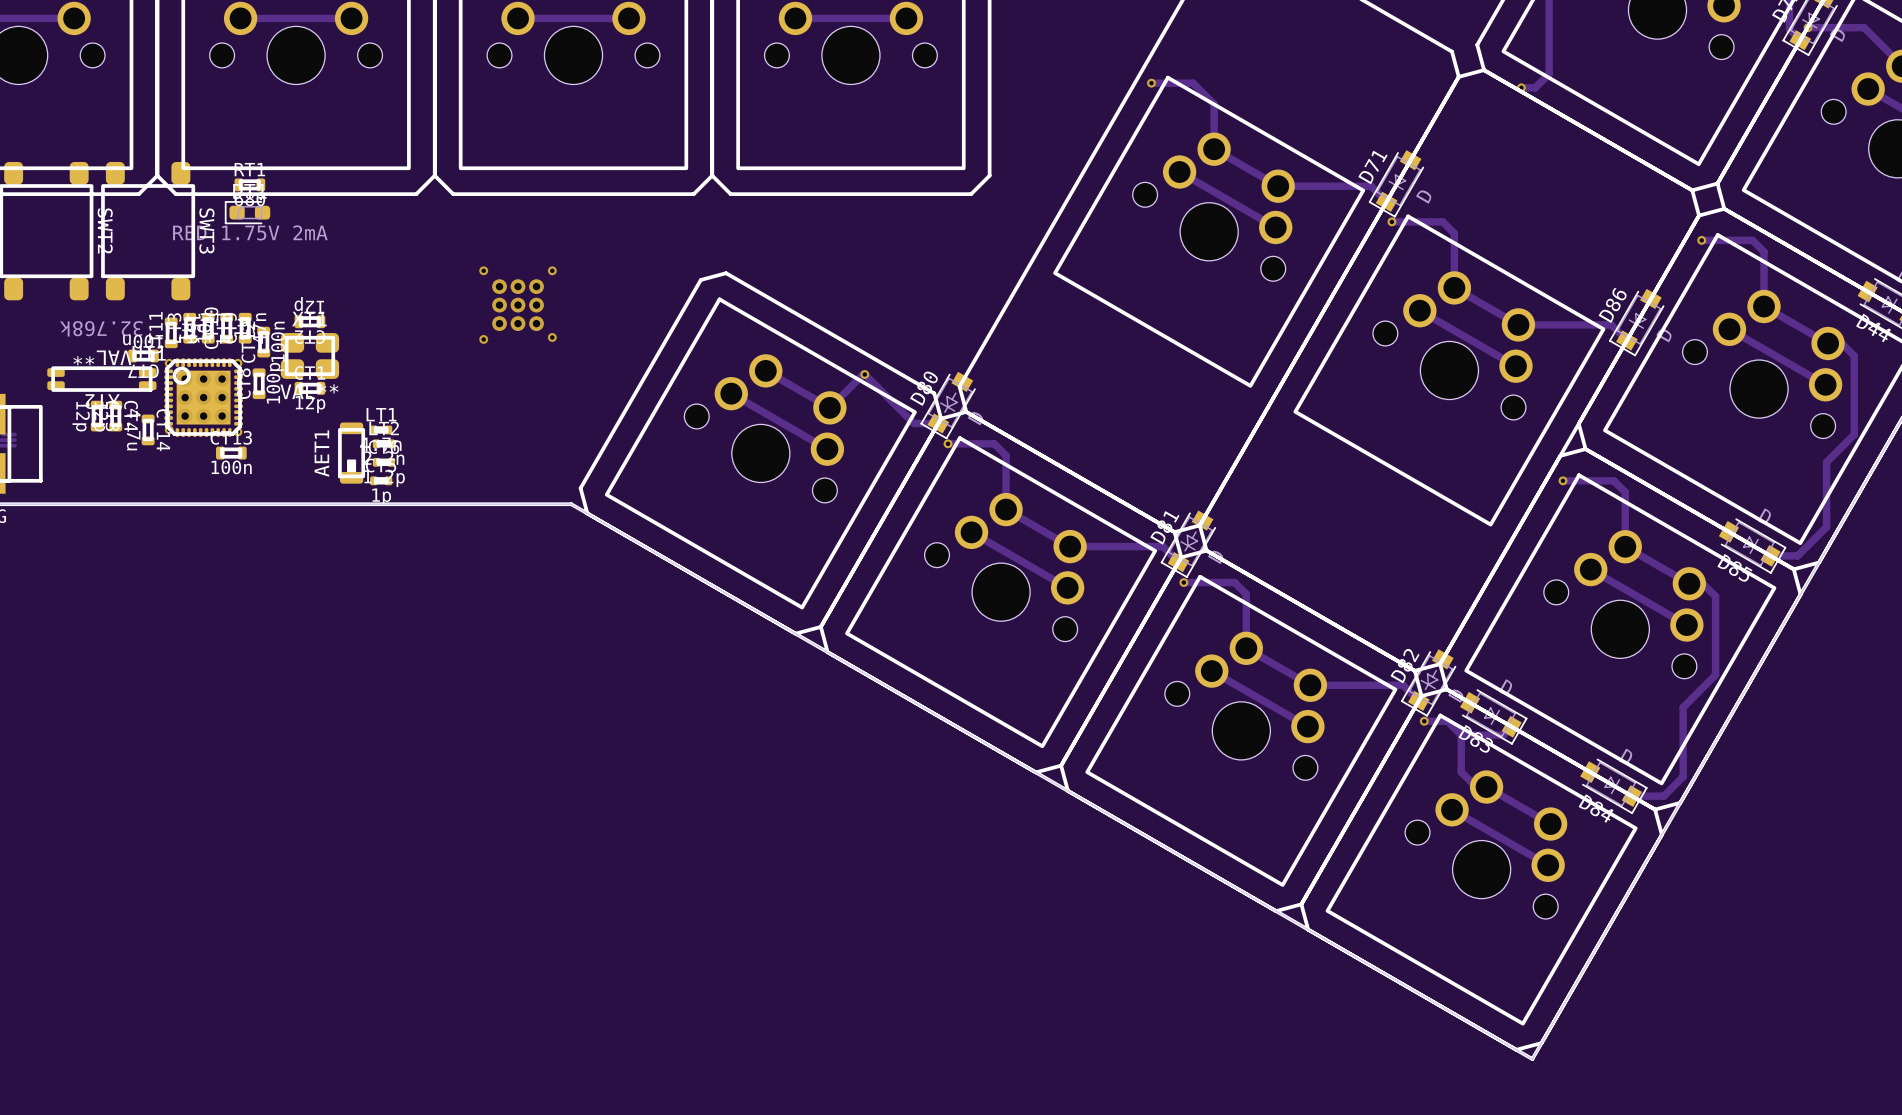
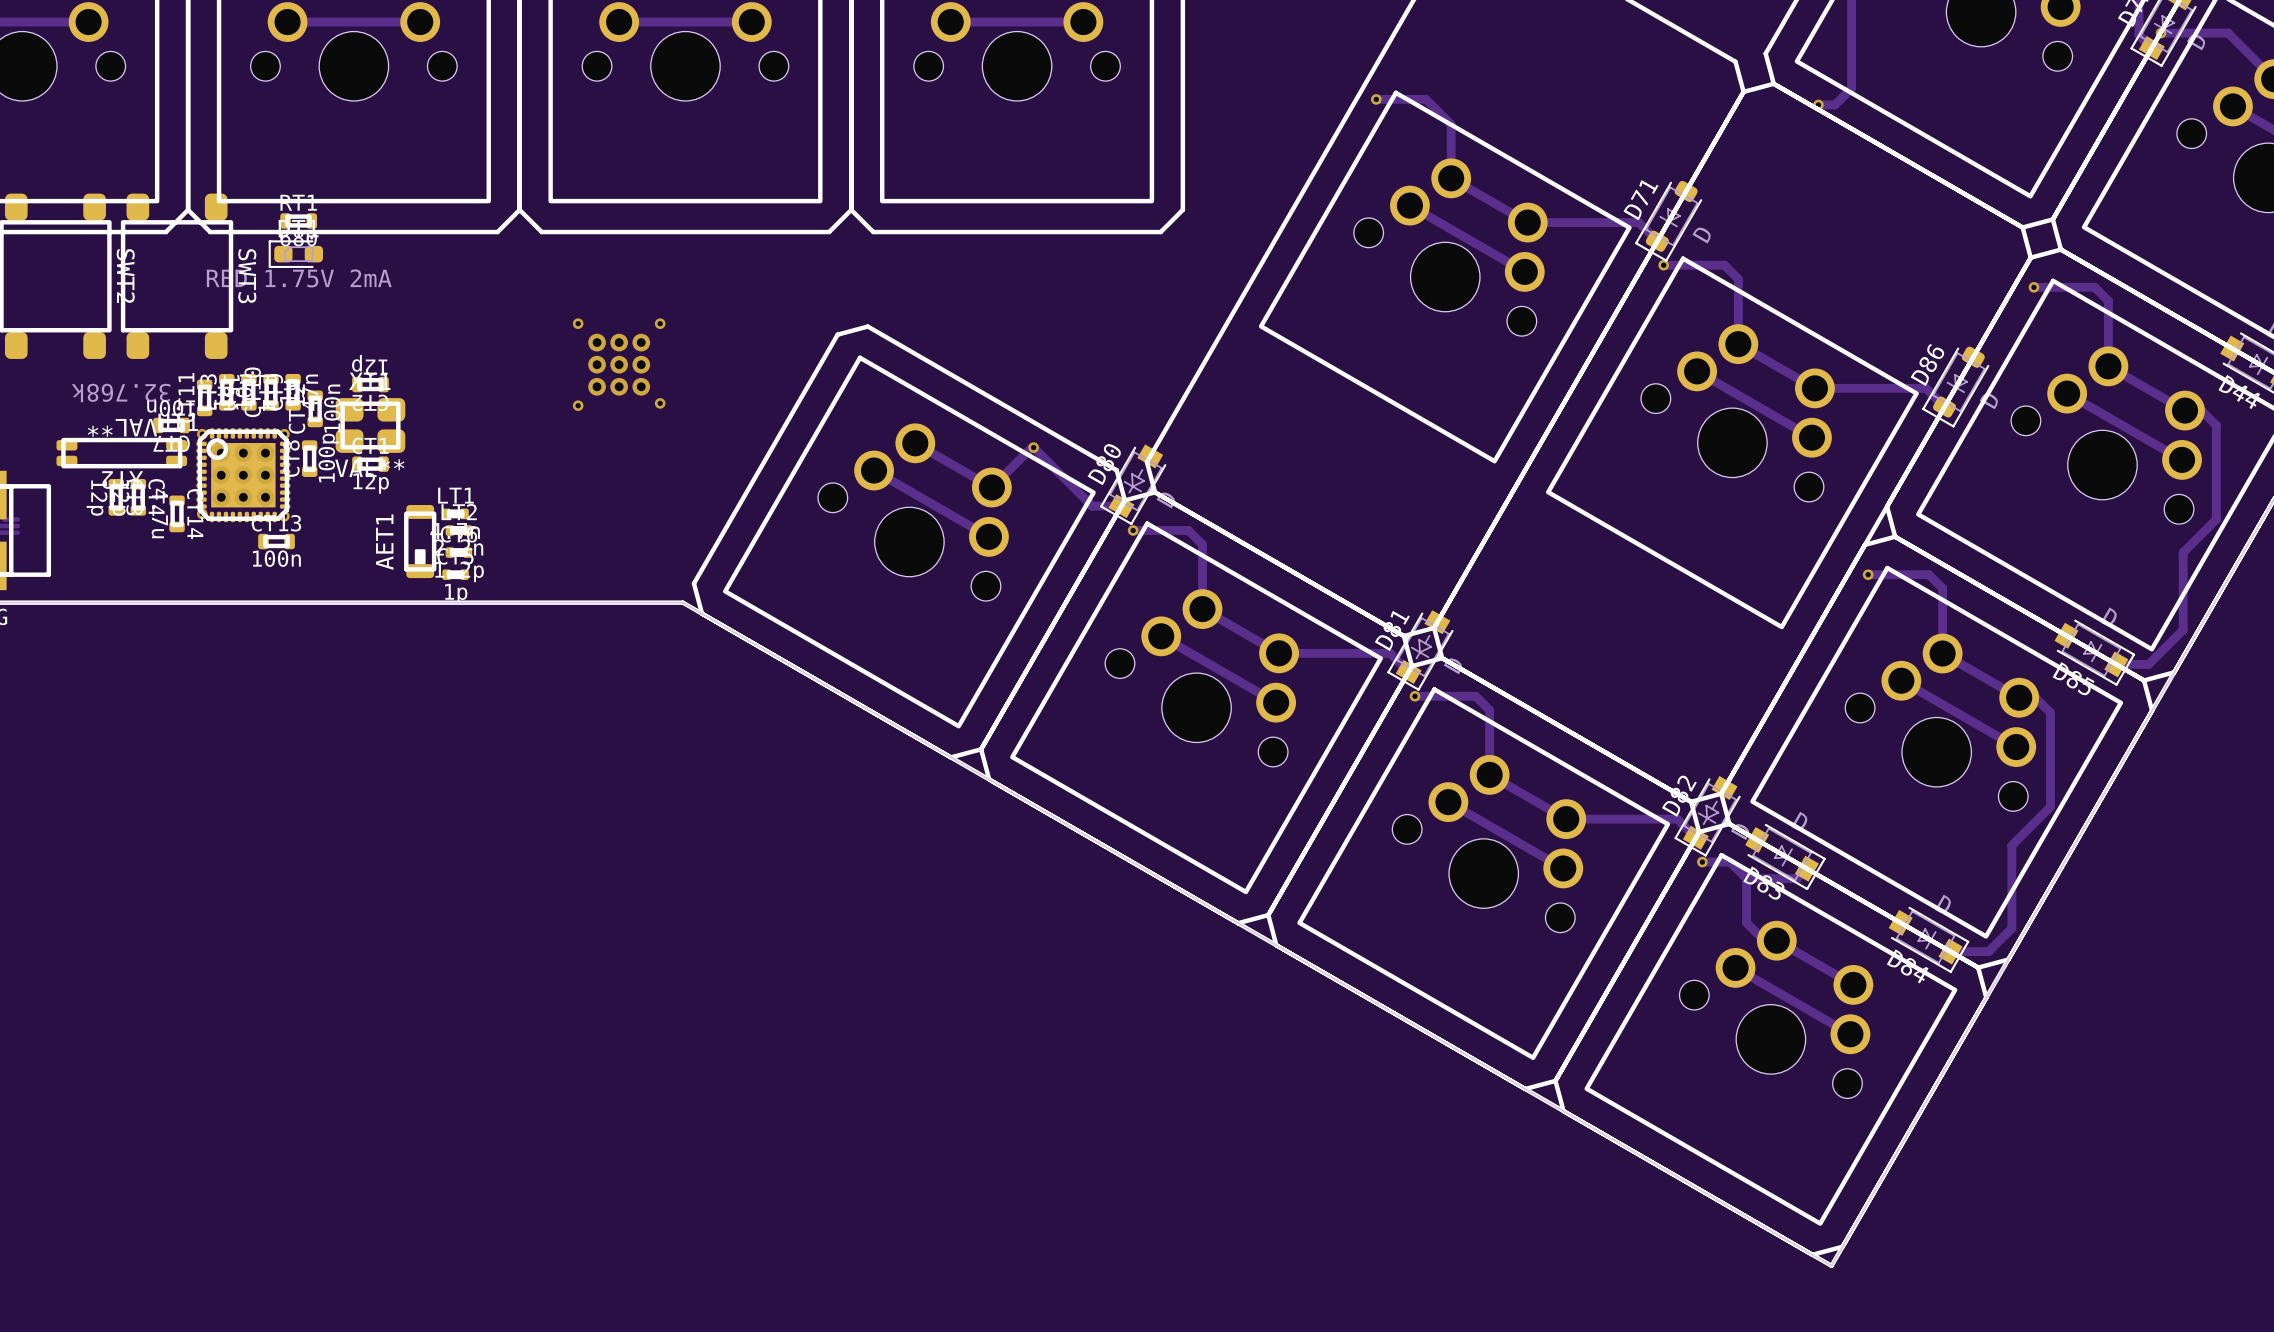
D71 footprint: [1368, 150, 1425, 218] -> [1635, 180, 1703, 262]
D86 footprint: [1609, 288, 1665, 357] -> [1922, 346, 1990, 428]

